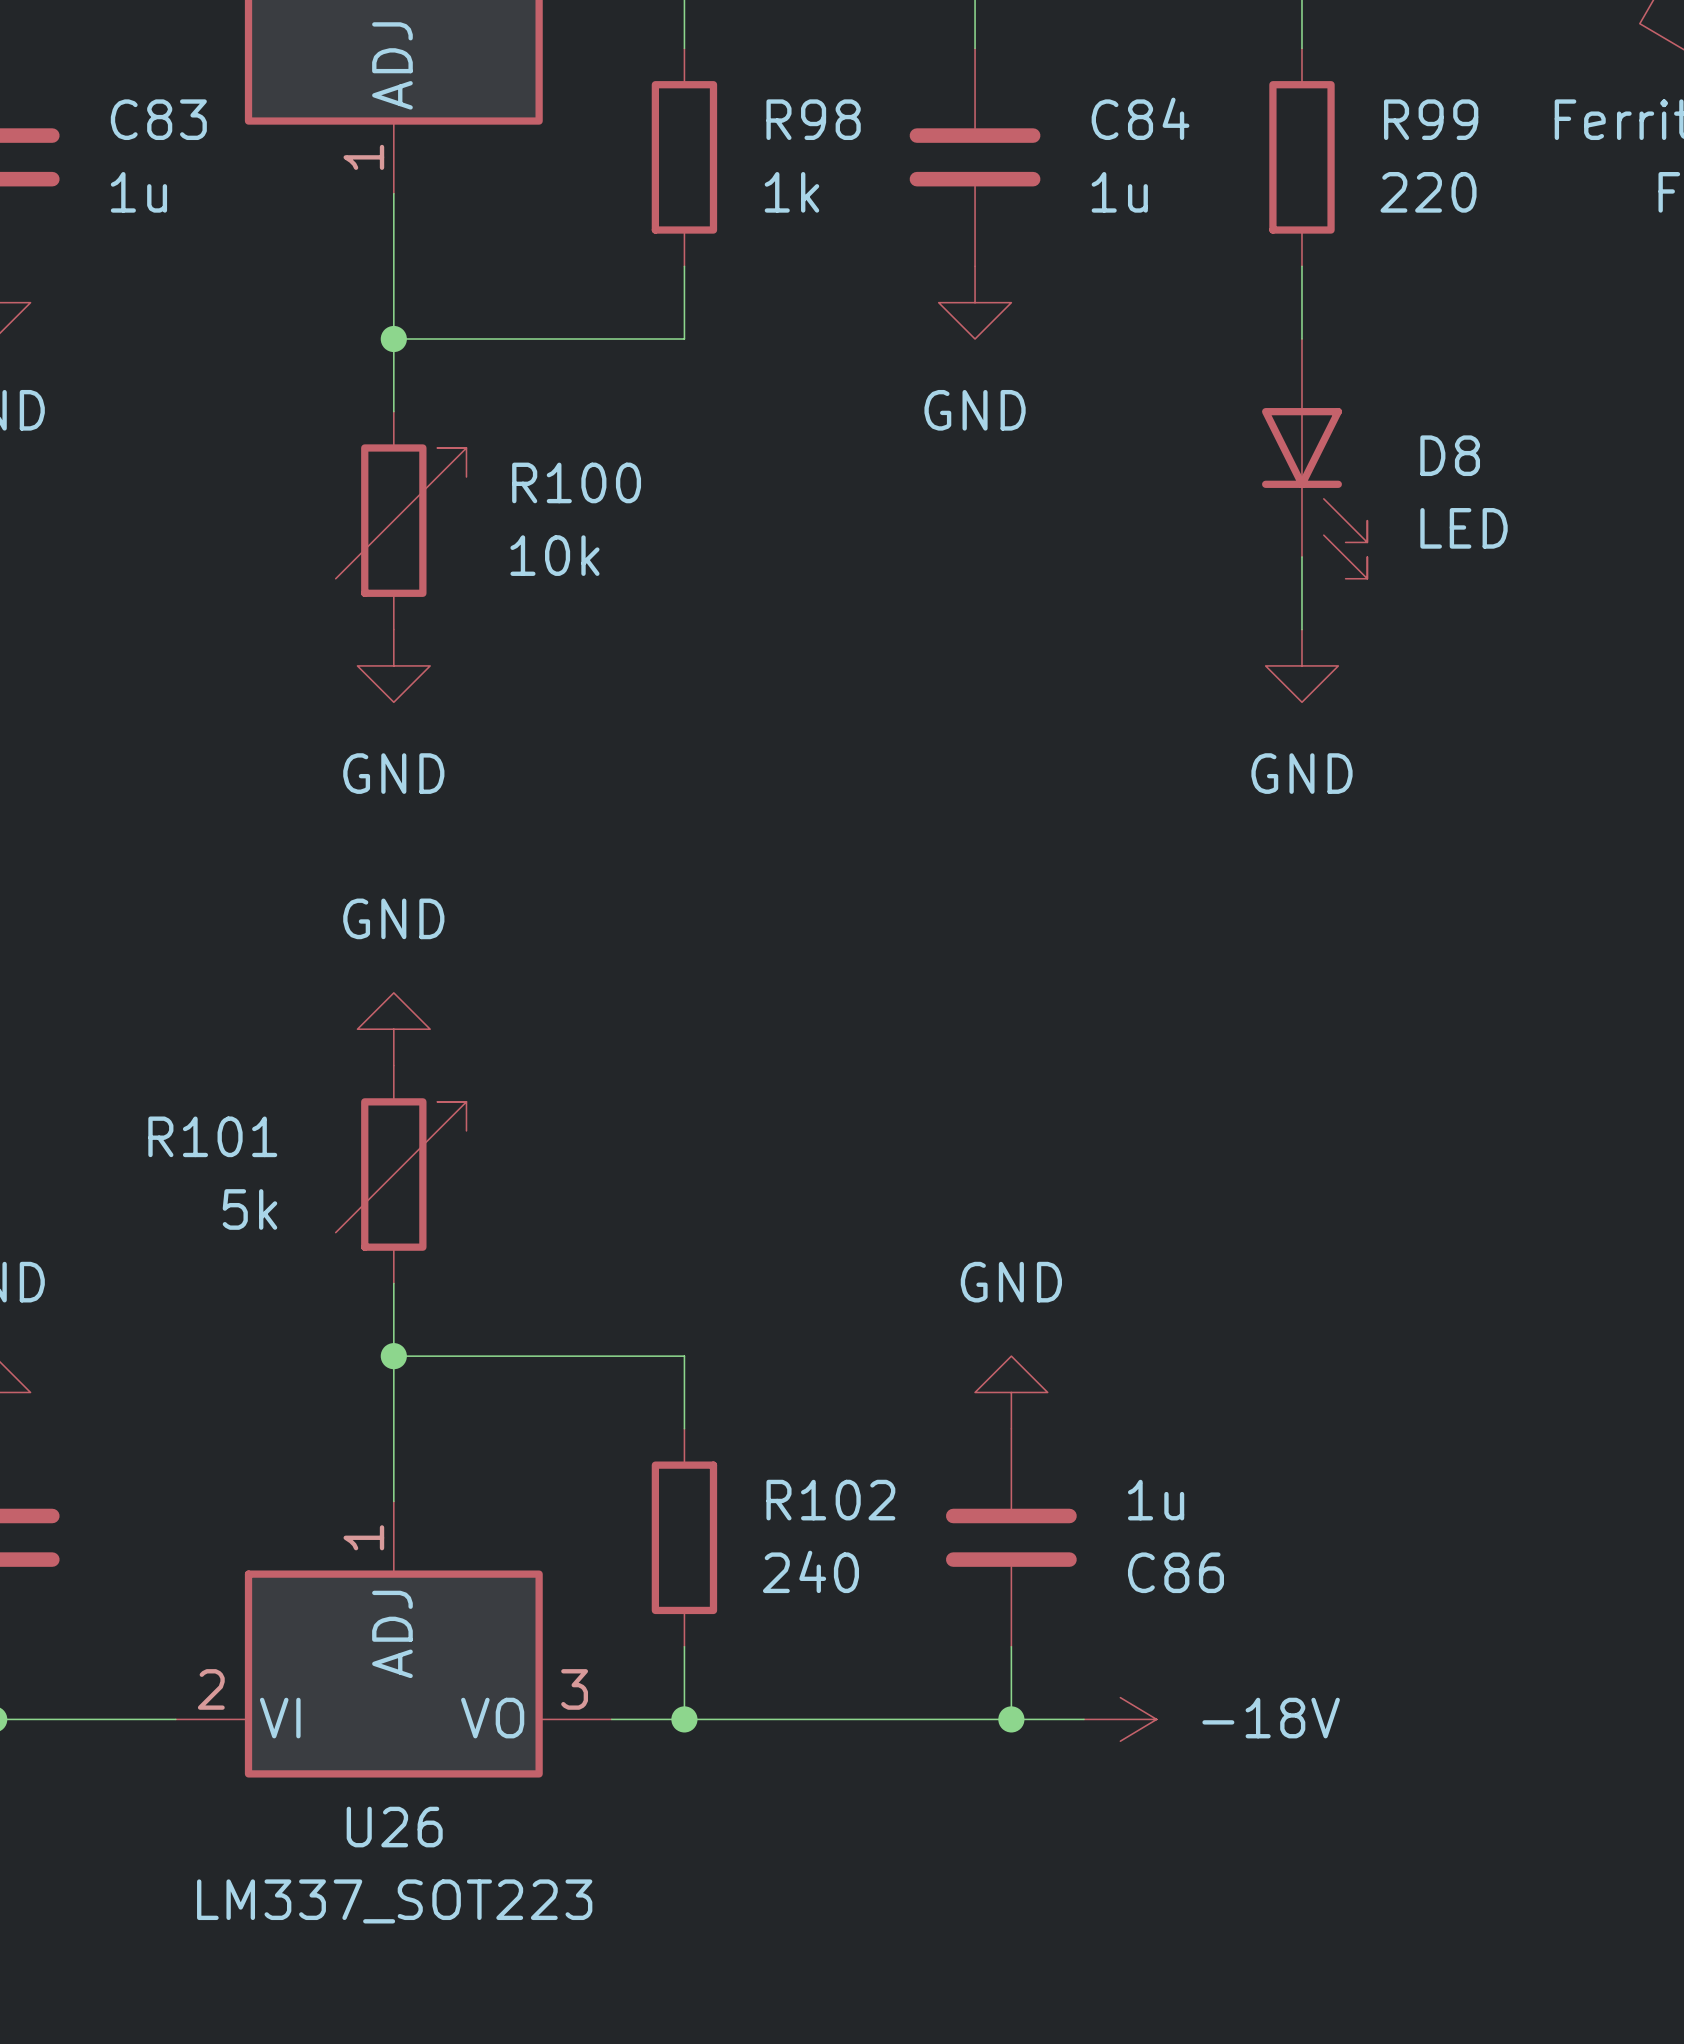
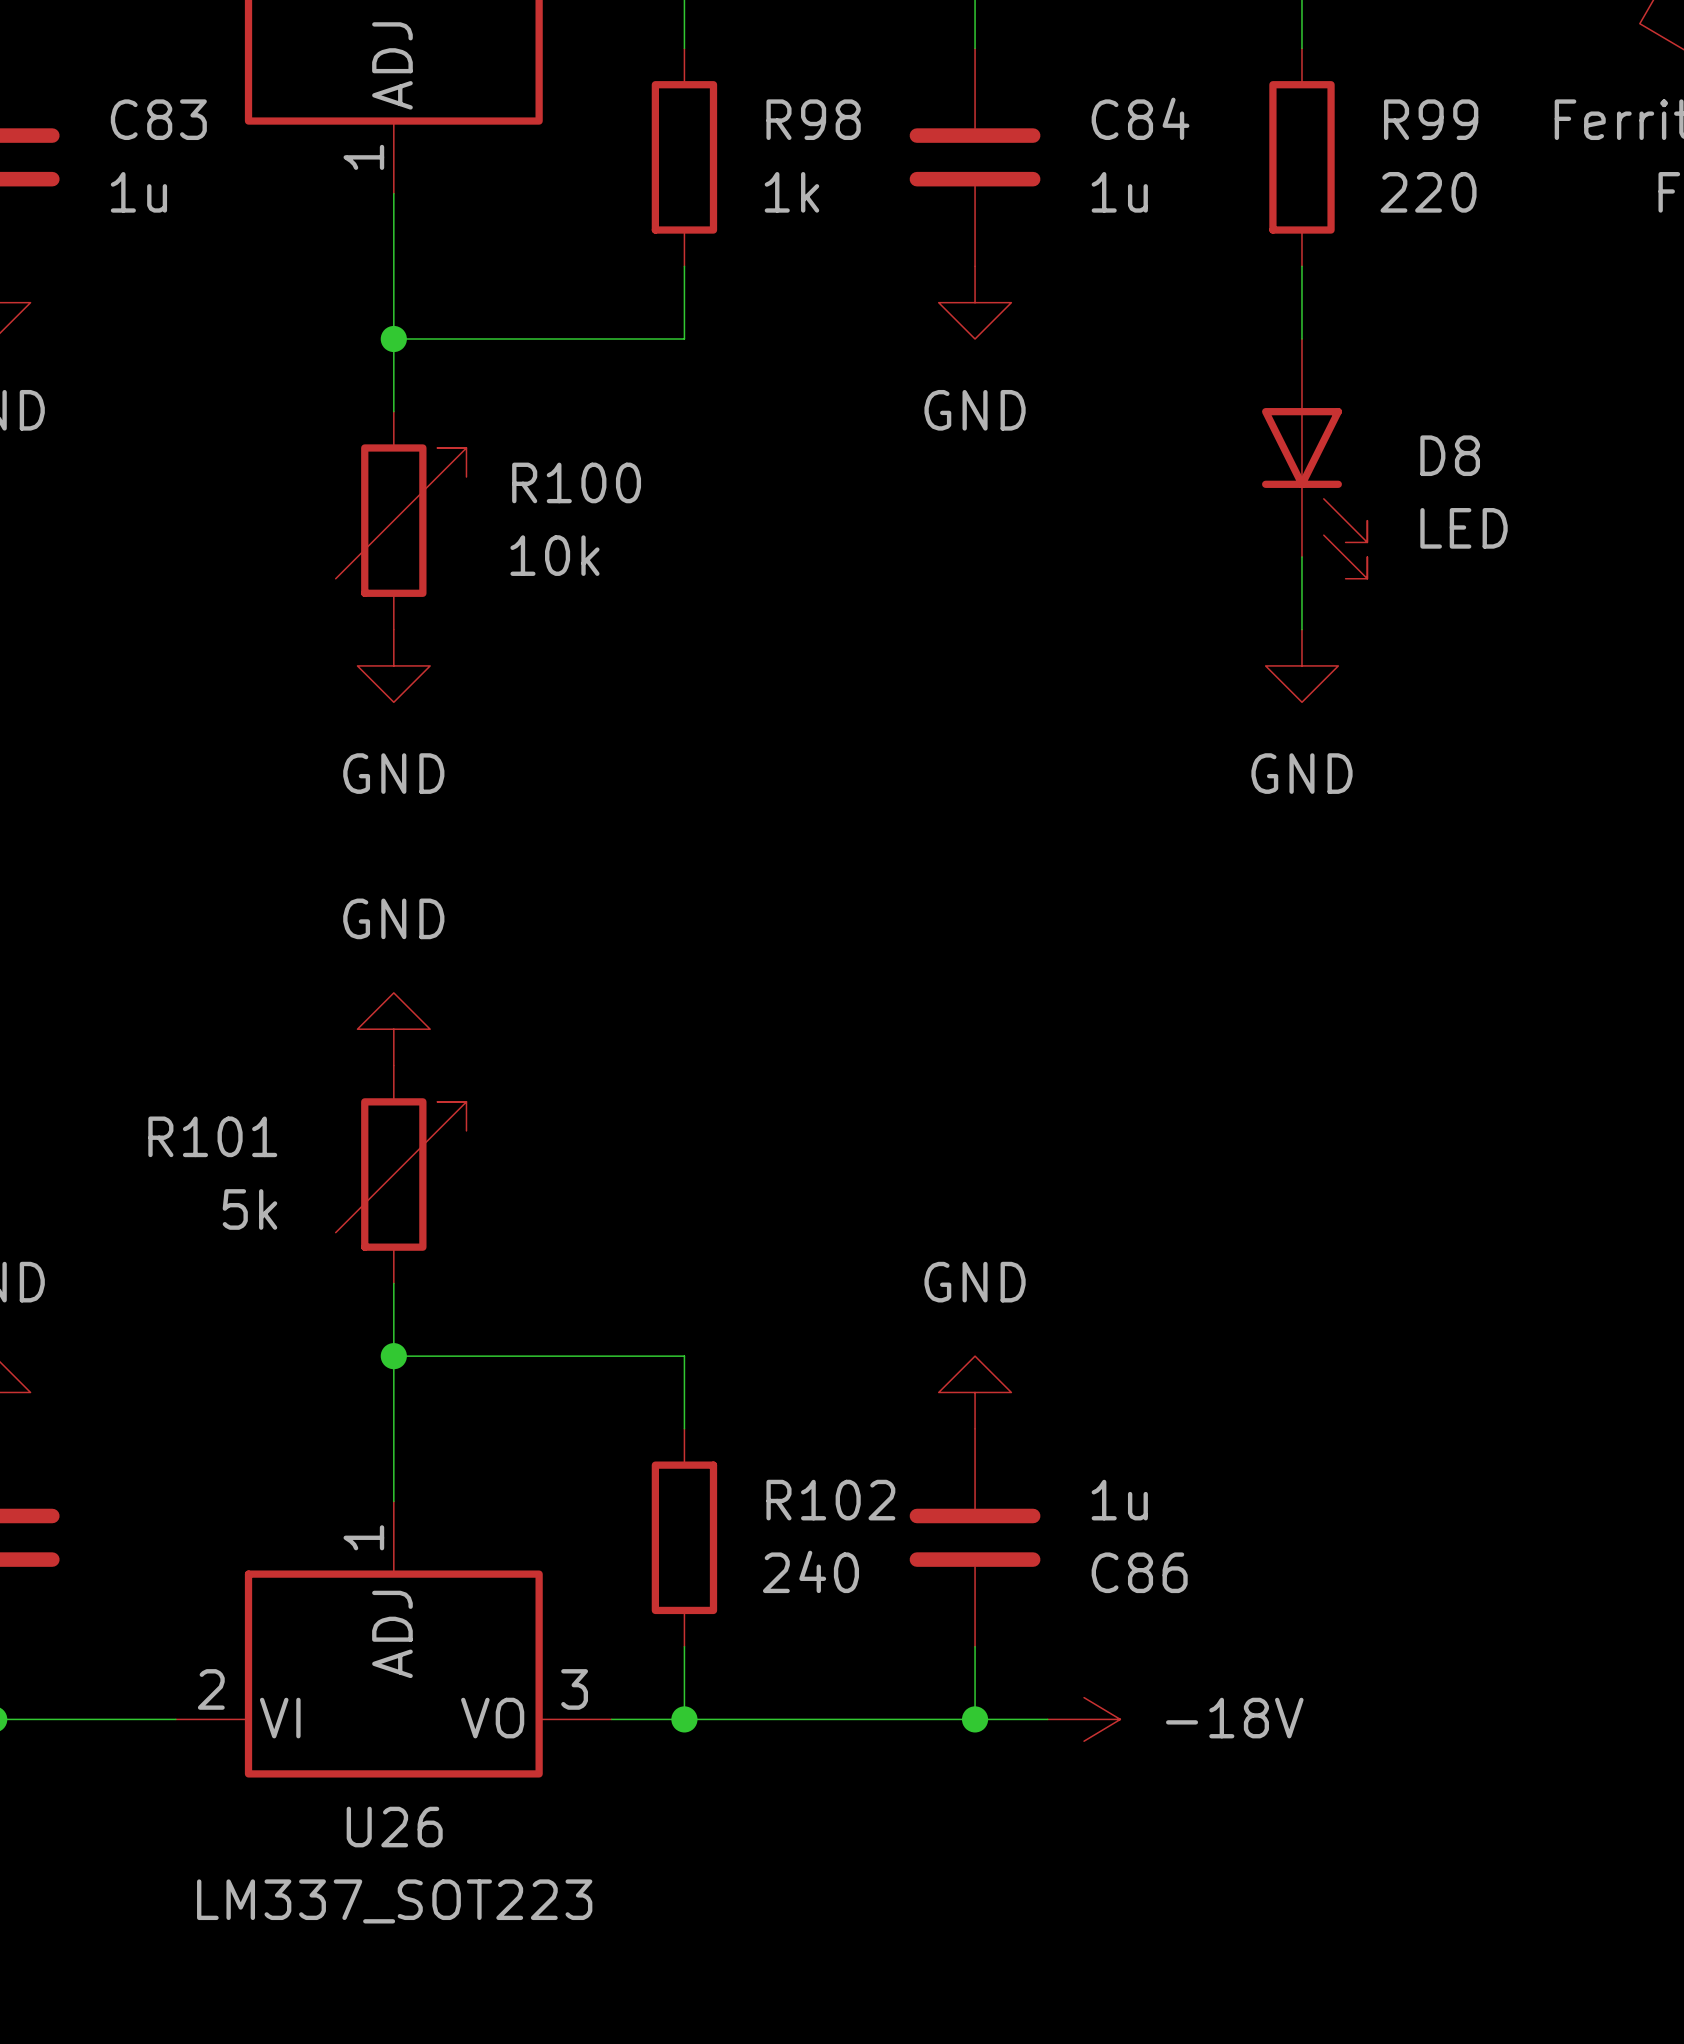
power symbol position: GND (1011, 1392) -> GND (975, 1392)
C86 position: (1011, 1537) -> (975, 1537)
wire: (1011, 1646) (1011, 1719) -> (975, 1646) (975, 1719)
junction position: (1011, 1719) -> (975, 1719)
power symbol position: -18V (1120, 1719) -> -18V (1084, 1719)

